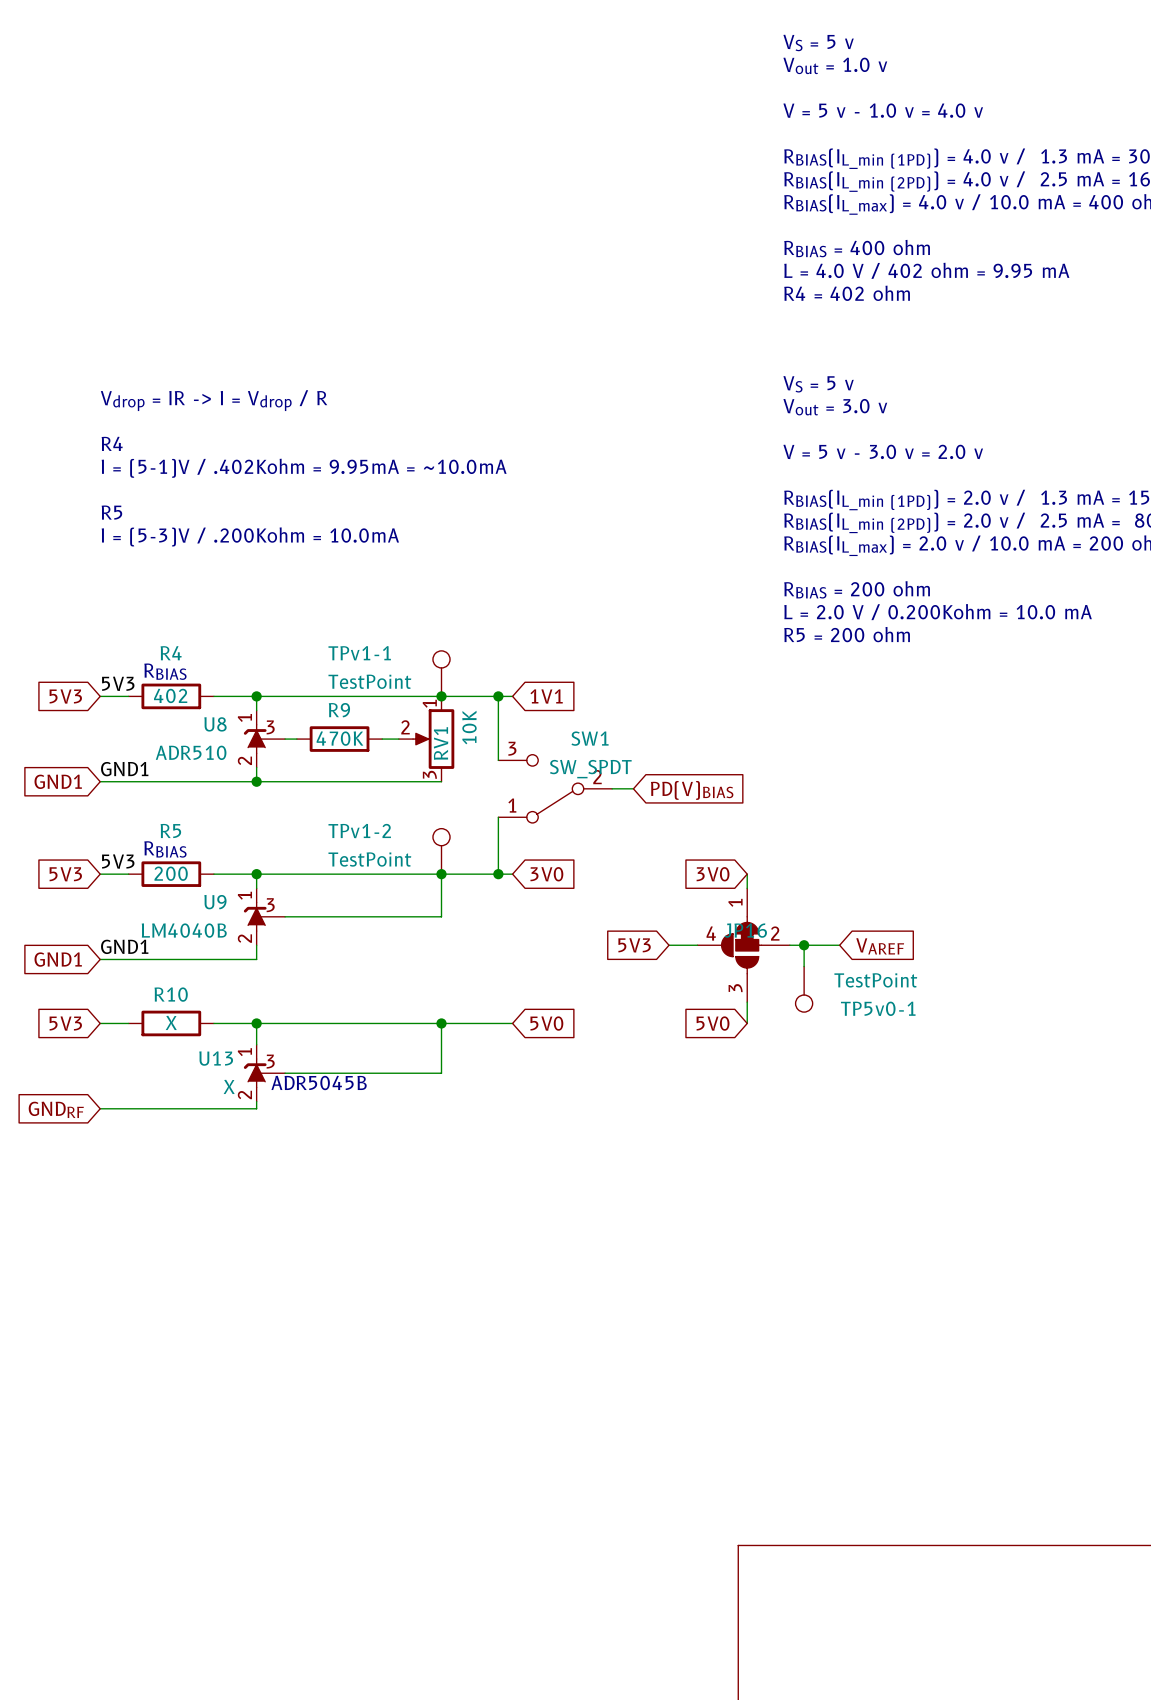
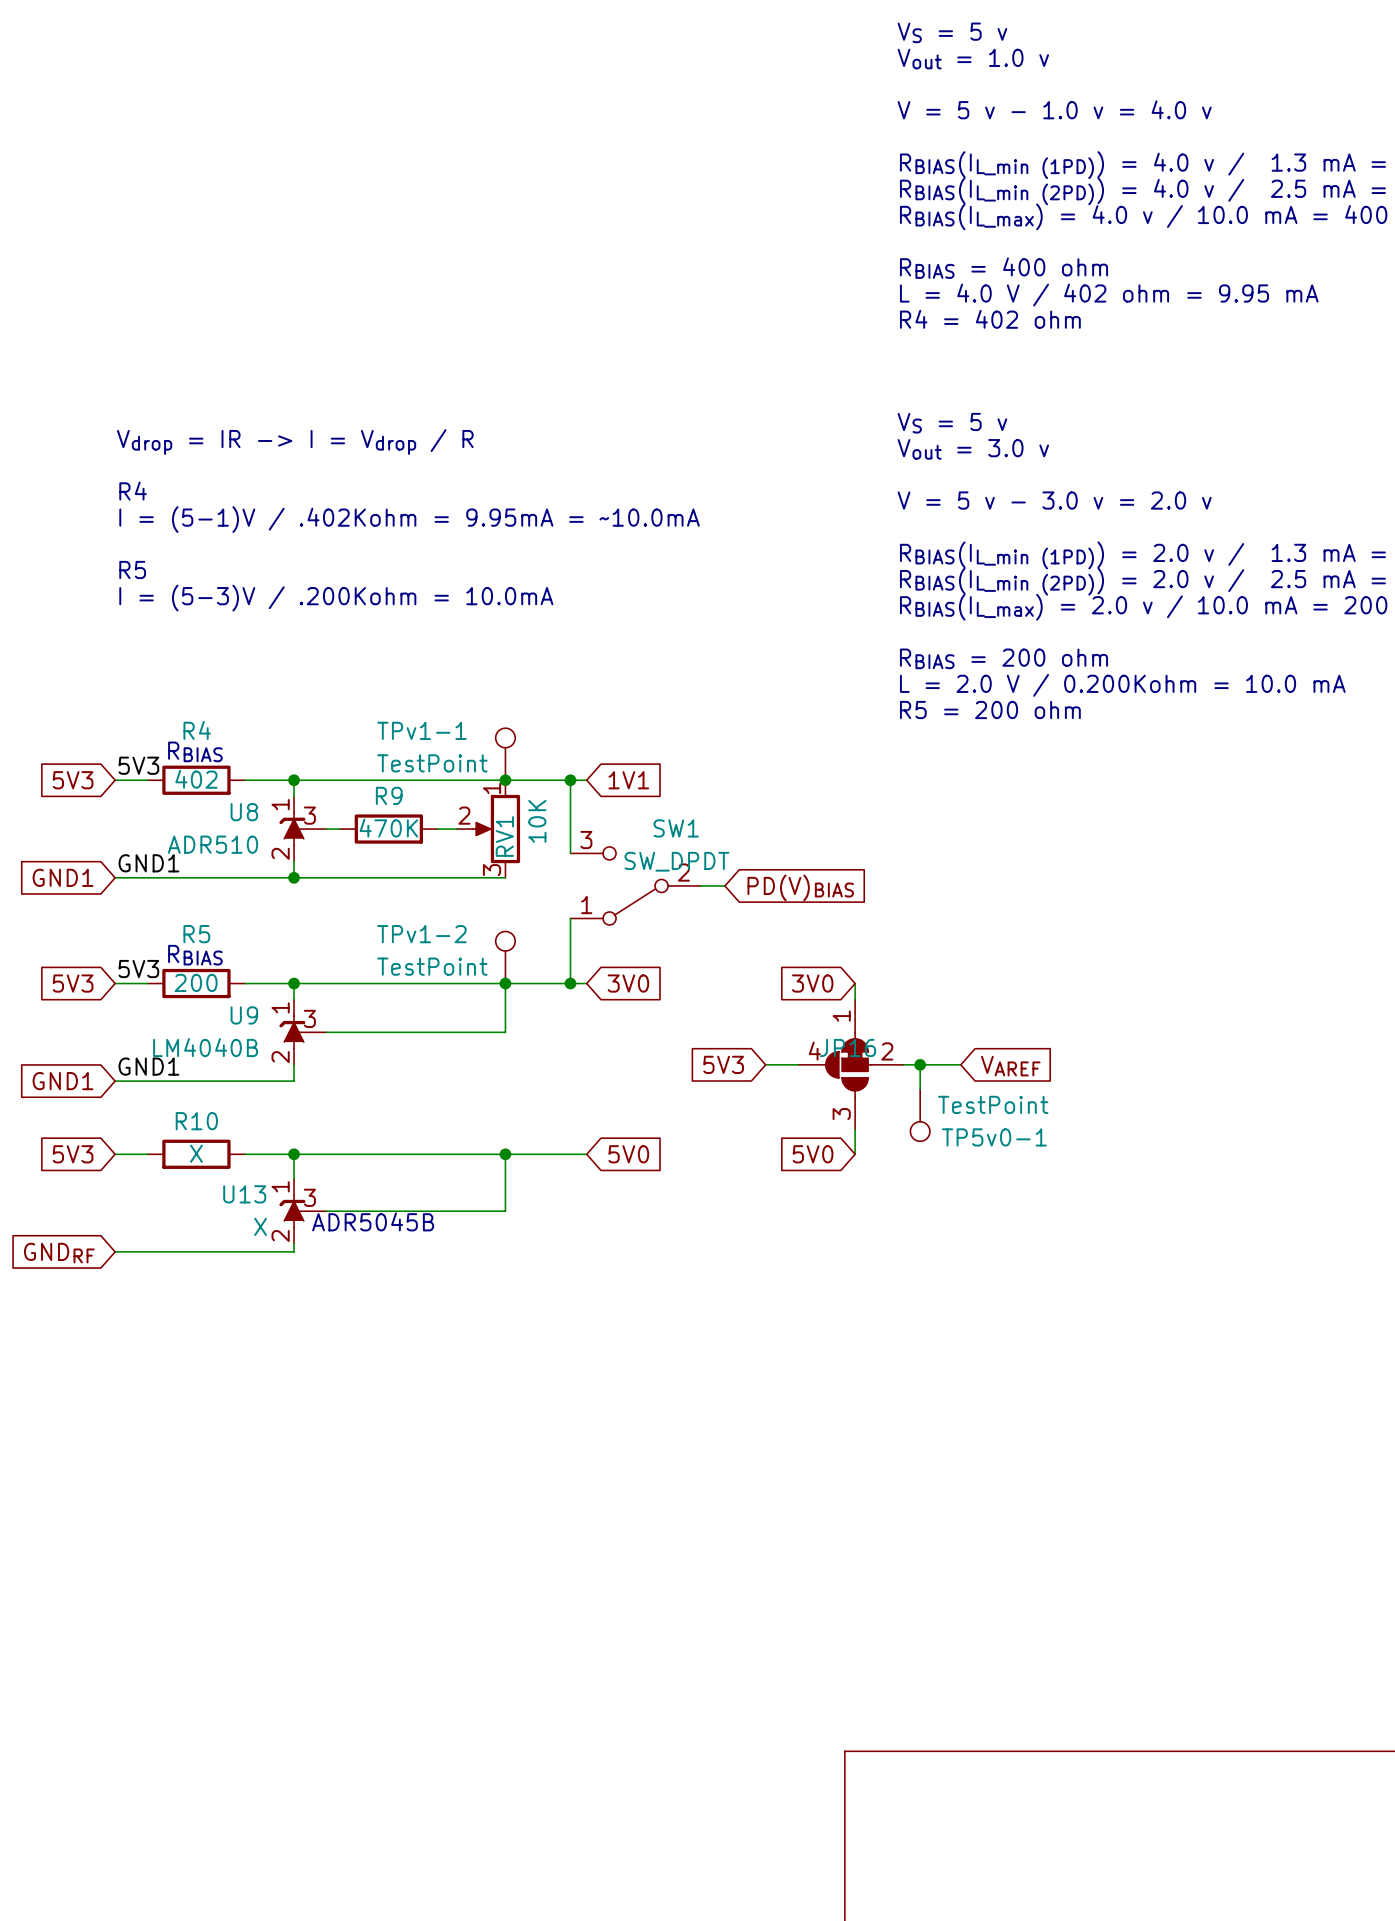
SW1 value: SW_SPDT (590, 769) -> SW_DPDT (676, 861)

